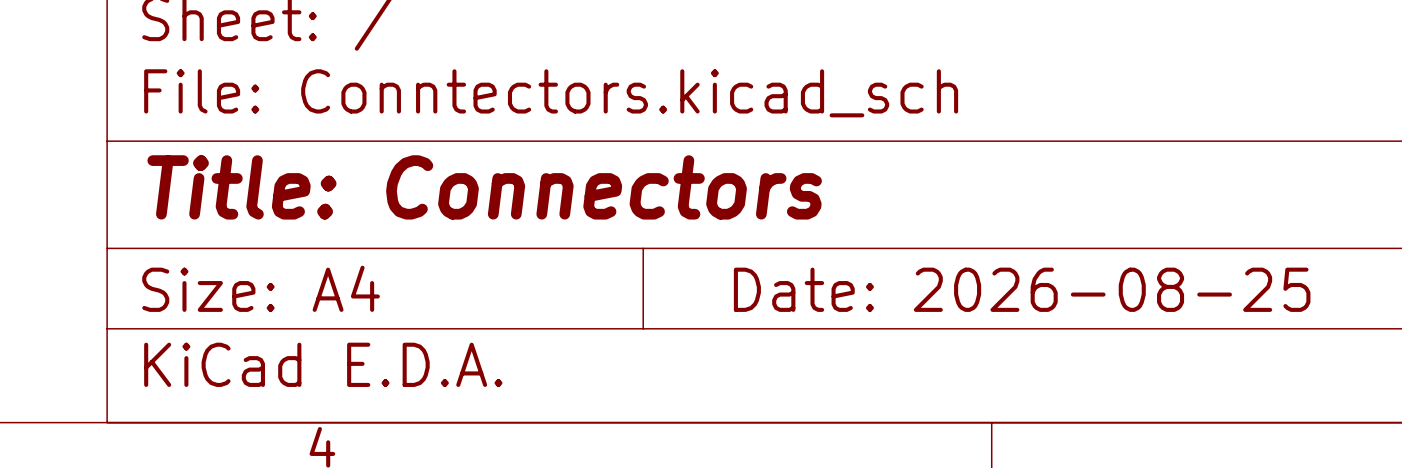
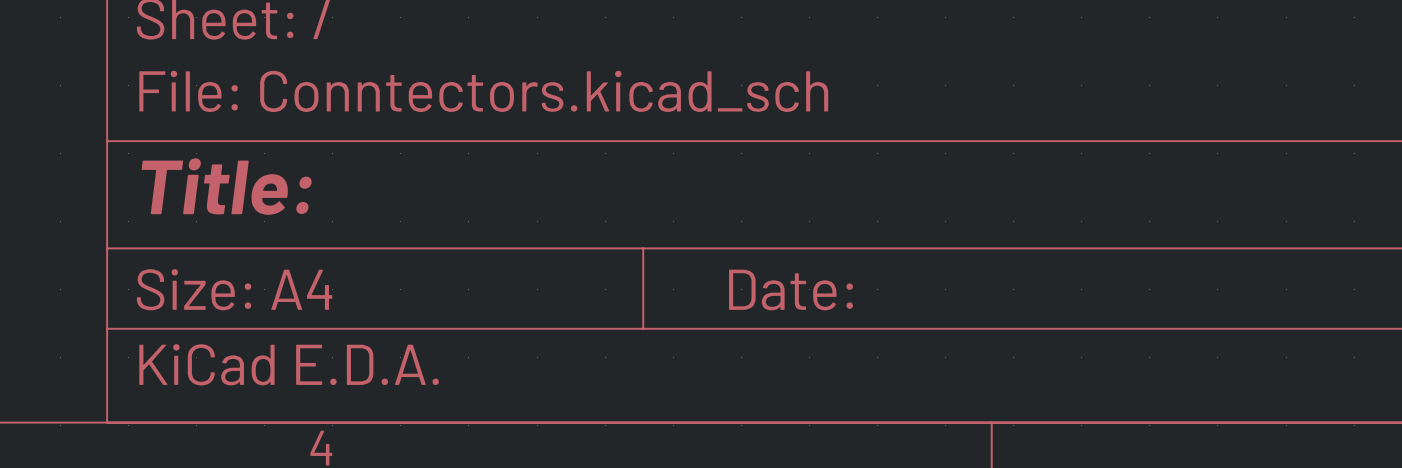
title block: Title: Connectors (484, 187) -> Title: (226, 186)
title block: Date: 2026-08-25 (1022, 289) -> Date: (790, 290)

